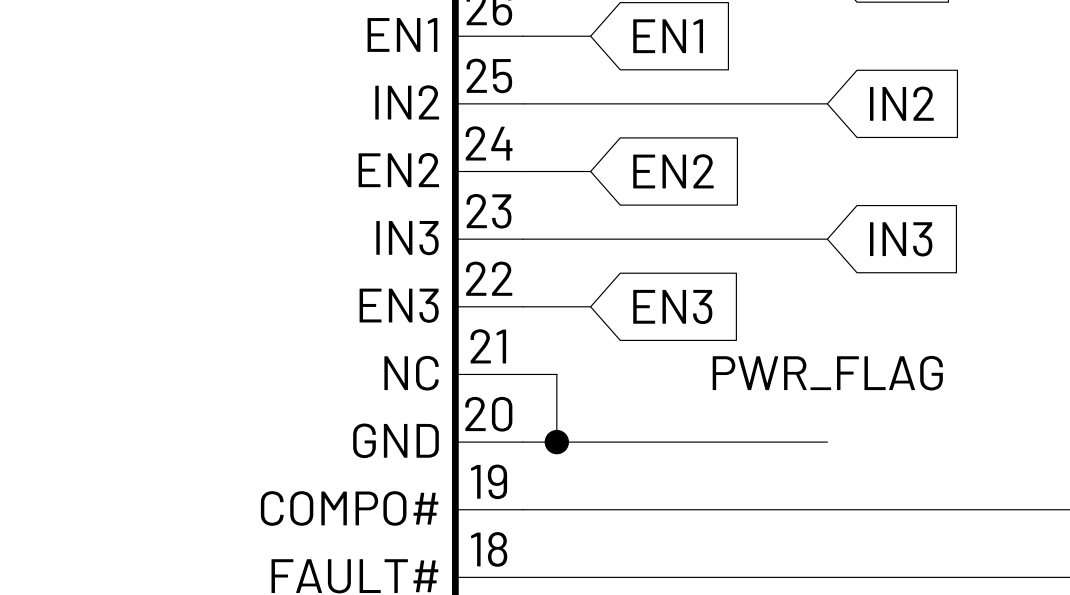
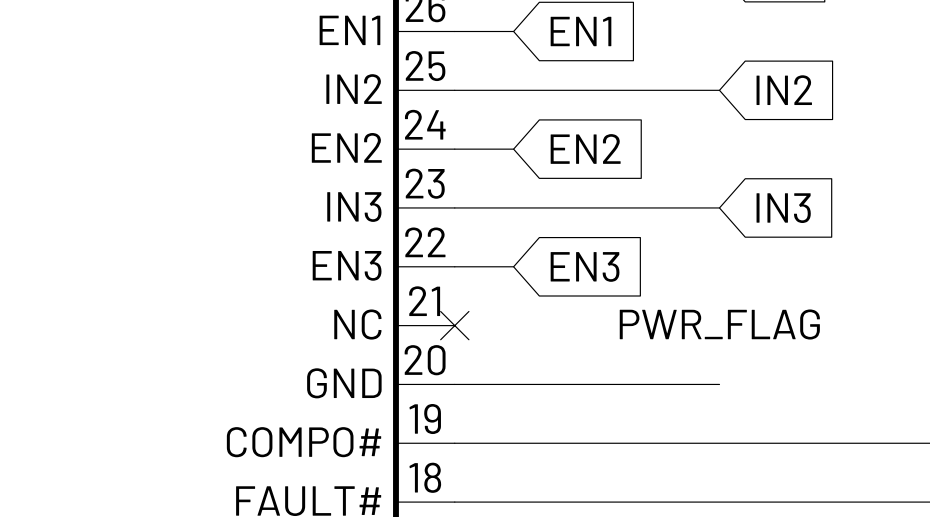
wire: (523, 374) (556, 374) (556, 442) -> none
no-connect mark: none -> (454, 325)
junction: (556, 442) -> none

